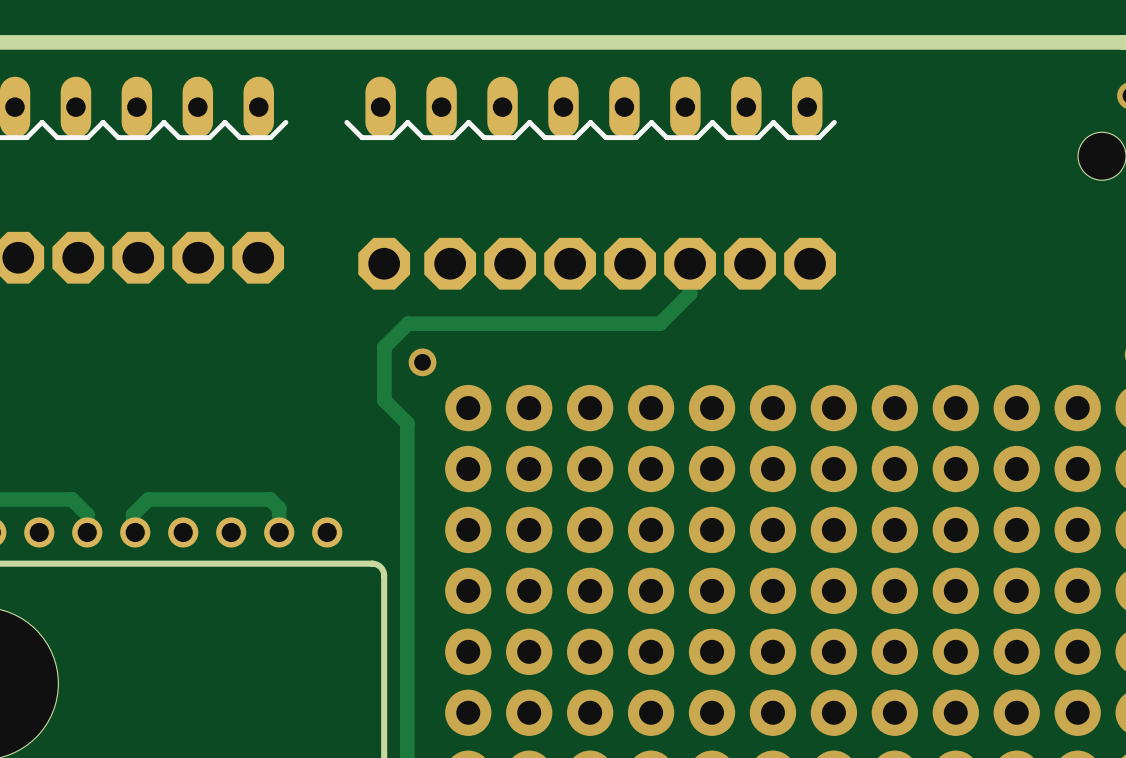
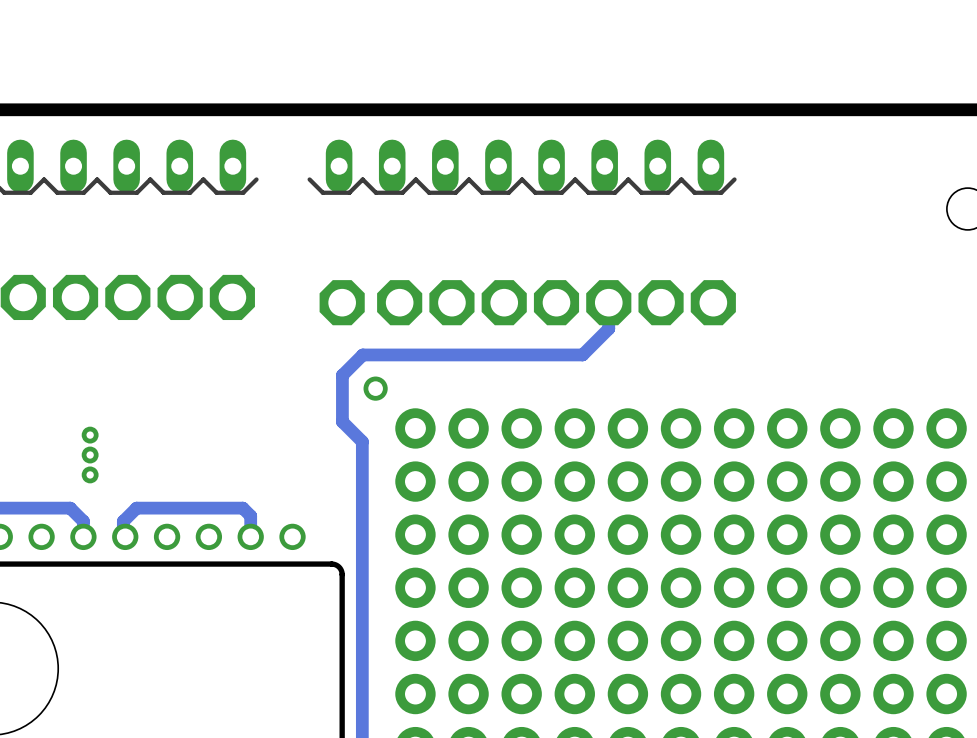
via: none -> (90, 435)
via: none -> (90, 455)
via: none -> (90, 474)

